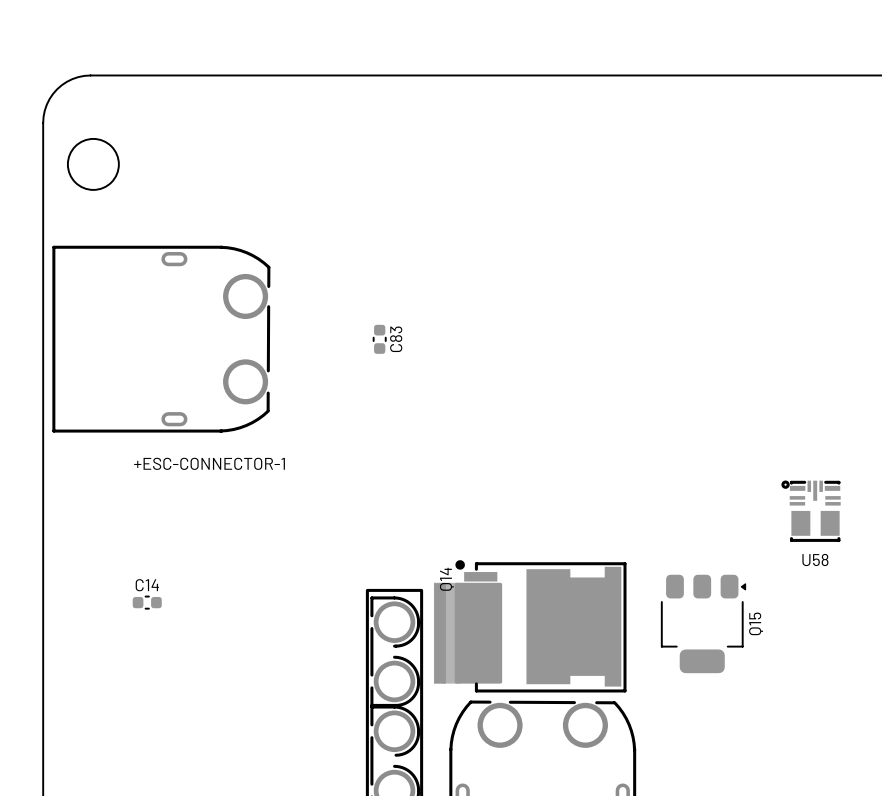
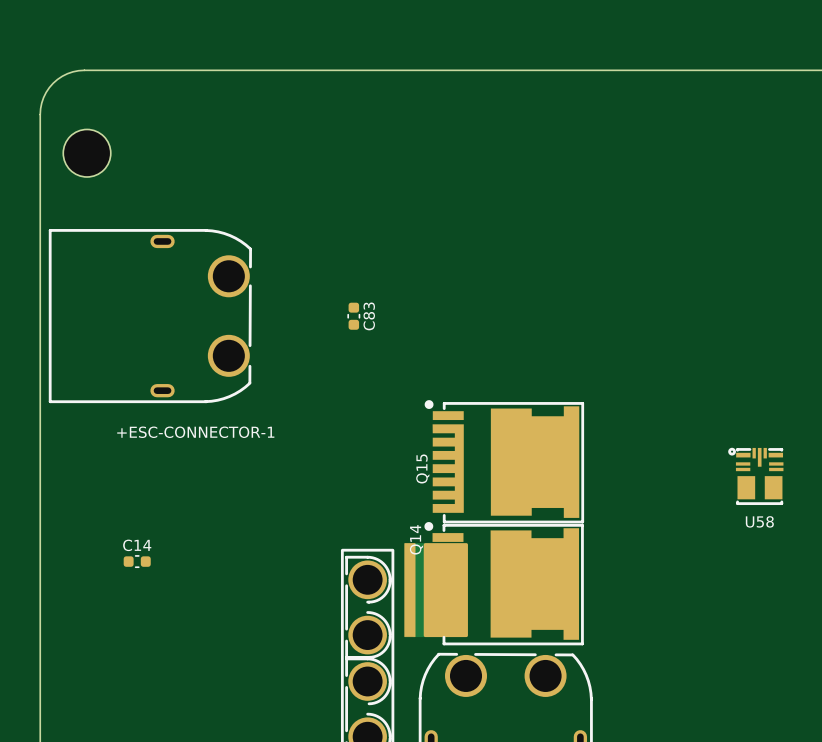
Q15 footprint: [661, 574, 747, 674] -> [424, 400, 585, 524]
Q15 name position: Q15 (756, 623) -> Q15 (422, 468)

